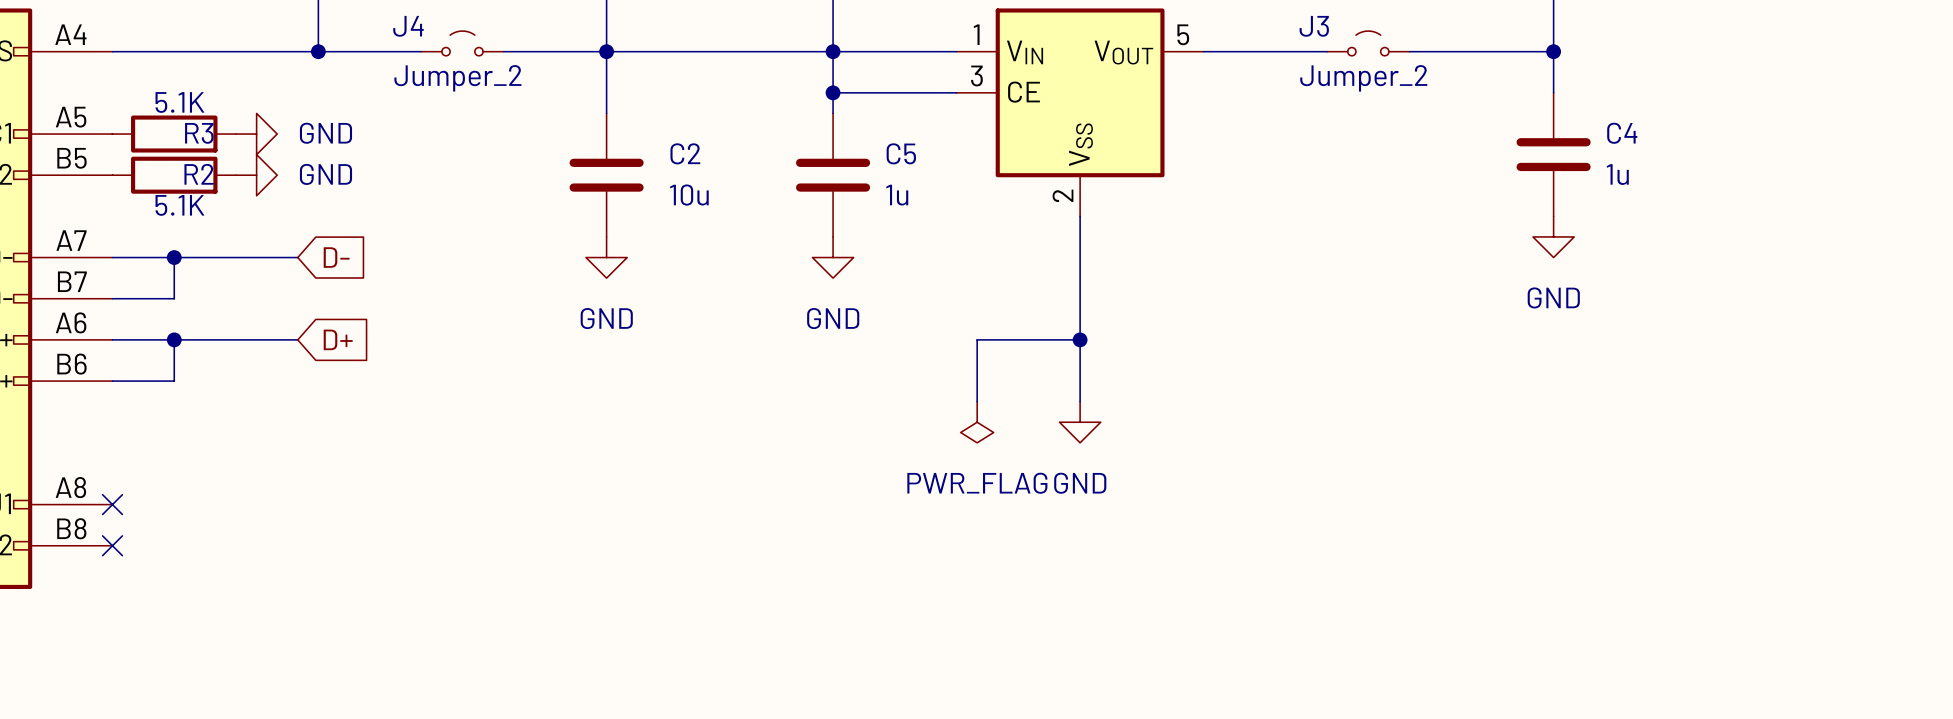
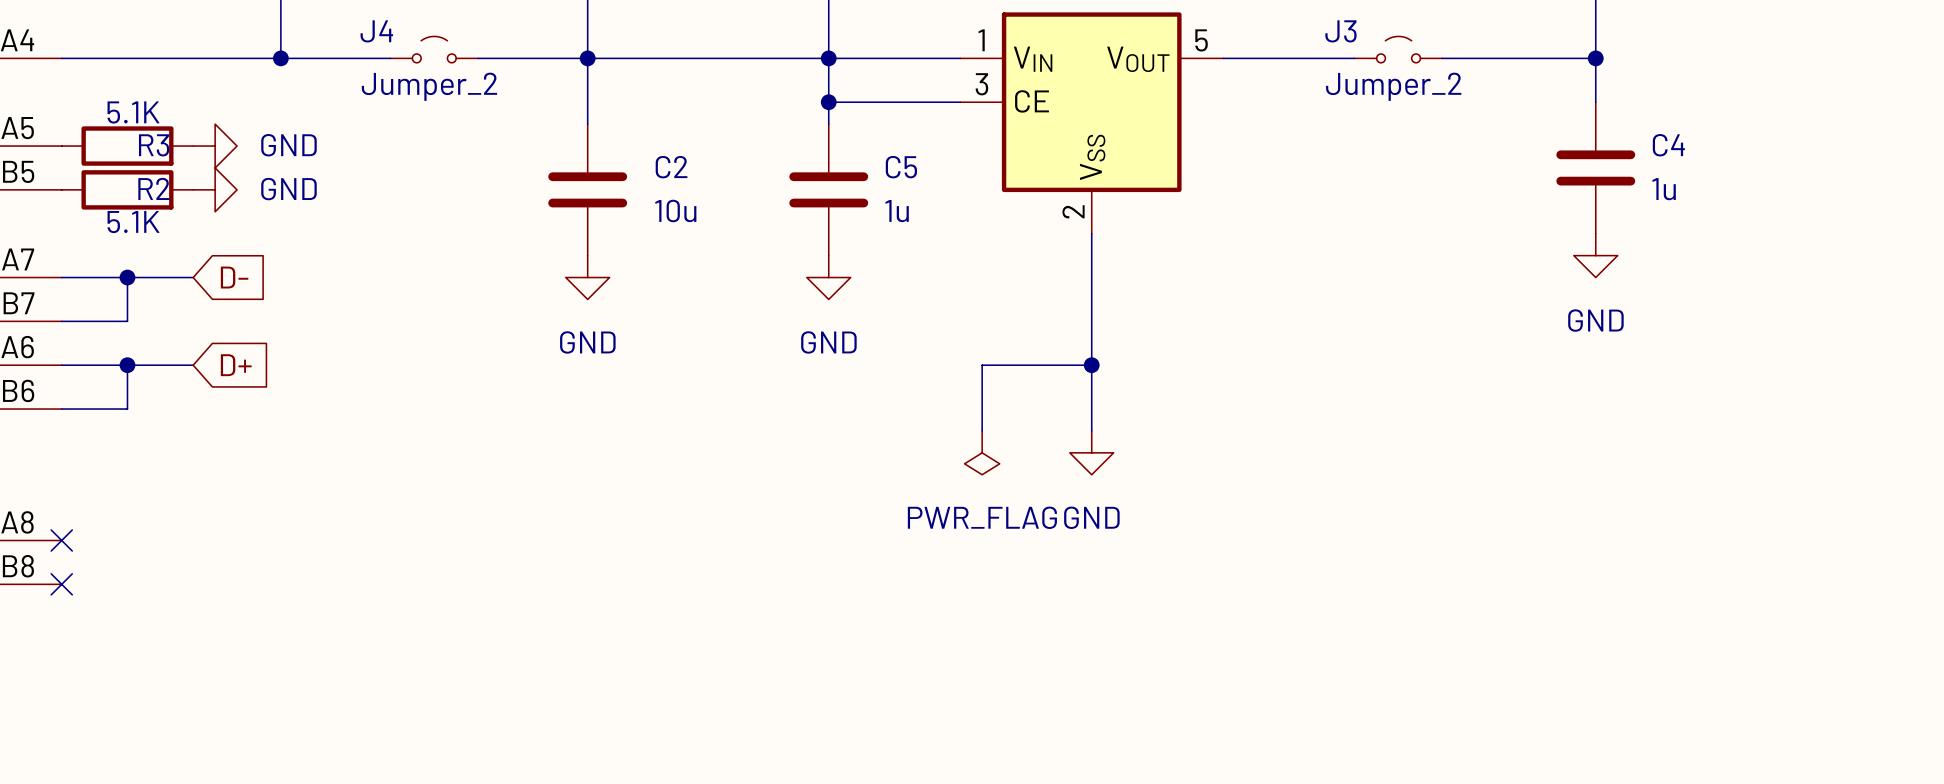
wire: (236, 257) (297, 257) -> none
global label position: D- (336, 257) -> D- (234, 277)
wire: (236, 339) (297, 339) -> none
global label position: D+ (338, 339) -> D+ (236, 365)

